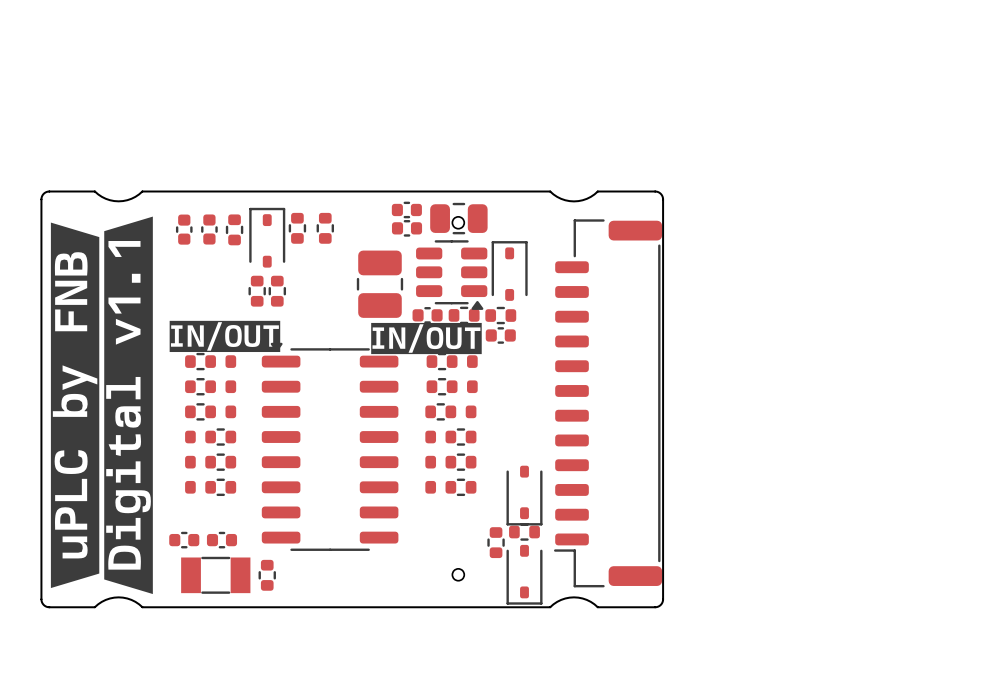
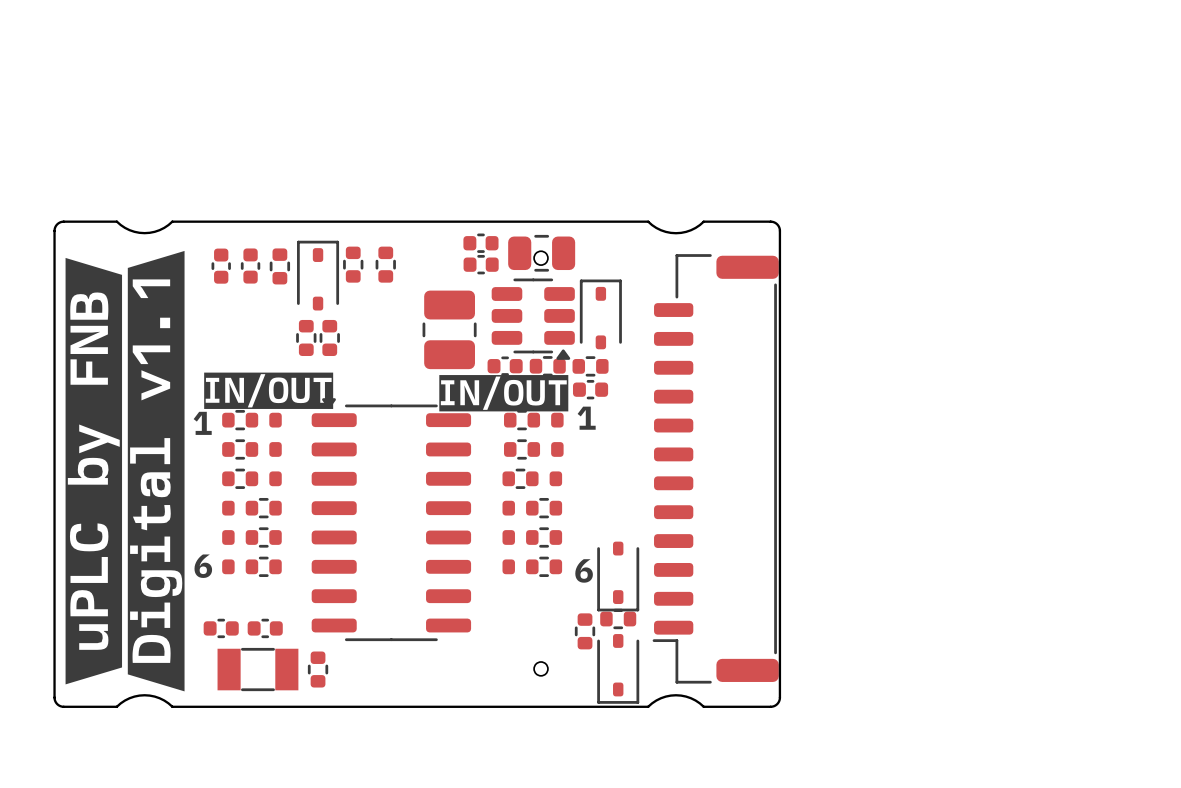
text: none -> 1 (586, 418)
text: none -> 1 (202, 423)
text: none -> 6 (203, 566)
text: none -> 6 (584, 570)

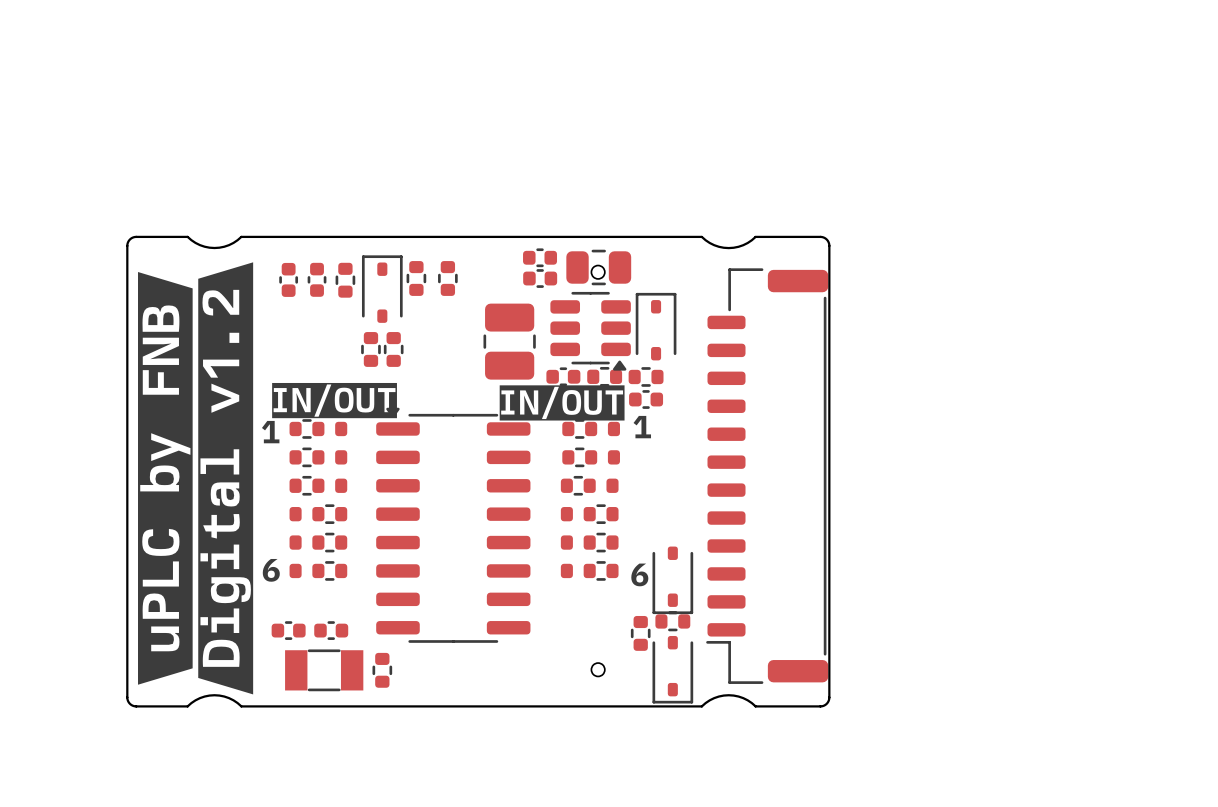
drawing shape: [127, 250, 185, 692] -> [198, 262, 254, 695]

